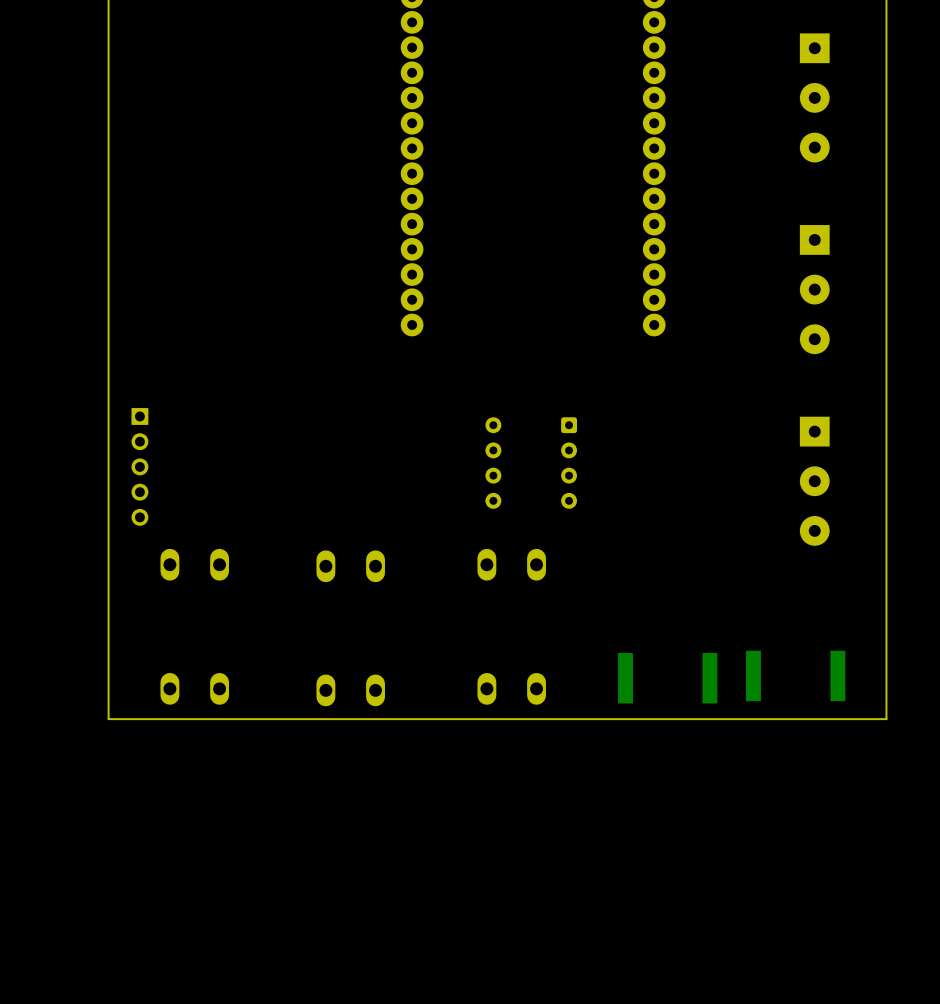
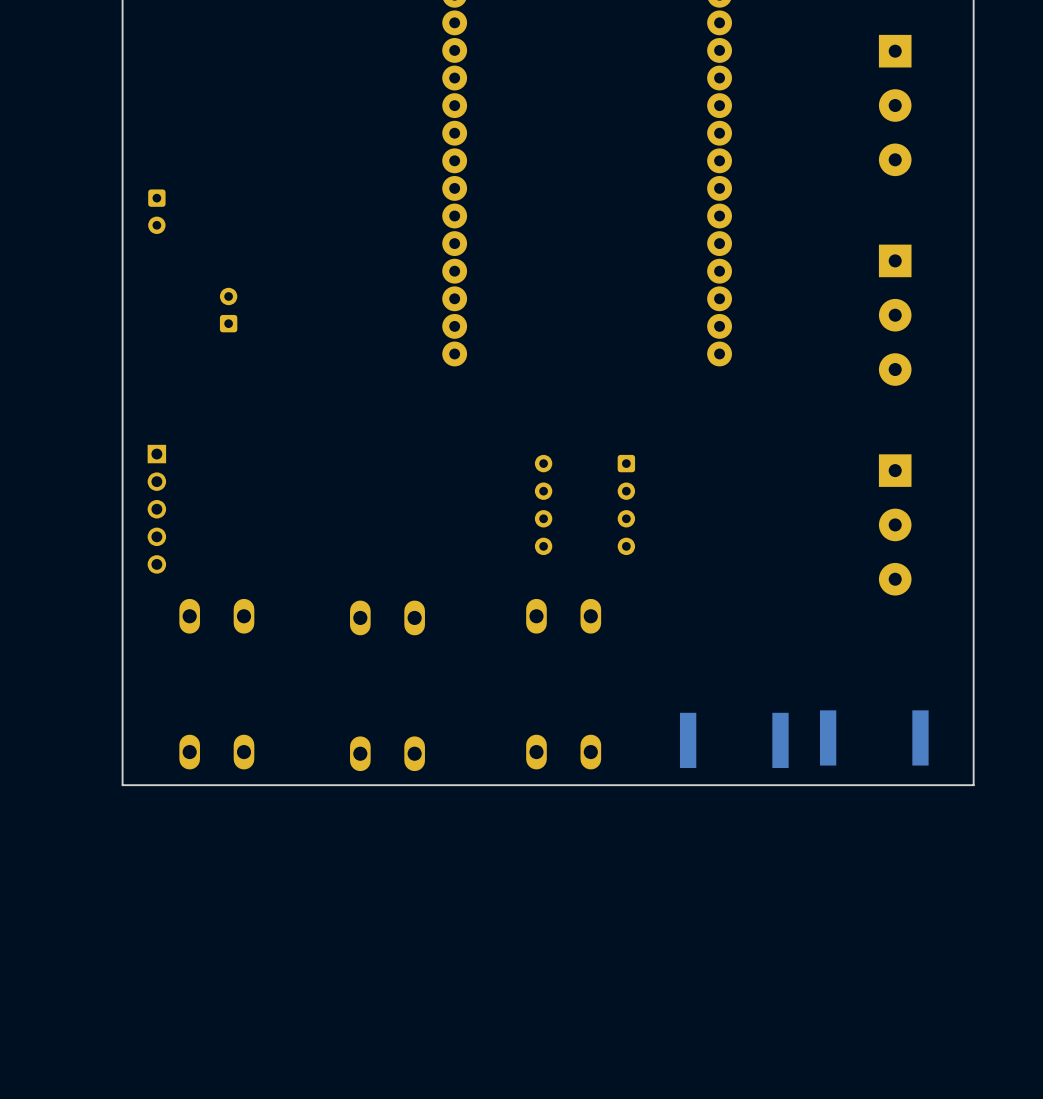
part: none -> (156, 211)
part: none -> (228, 310)

